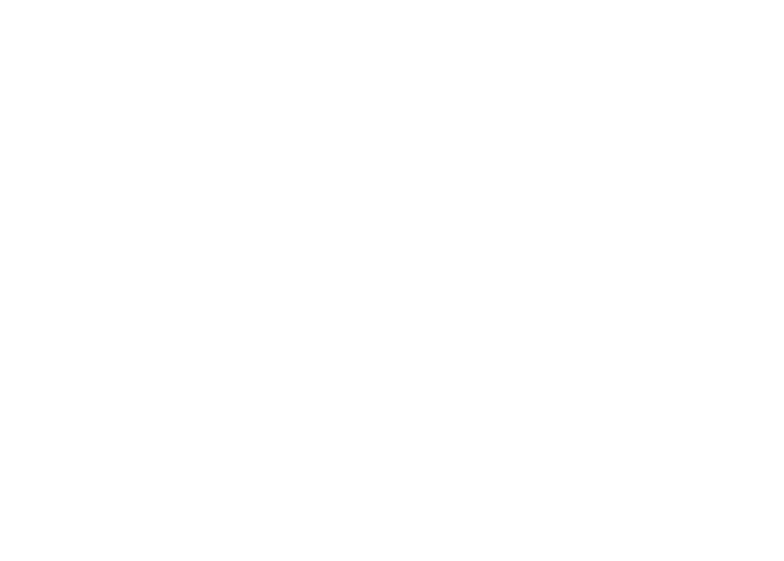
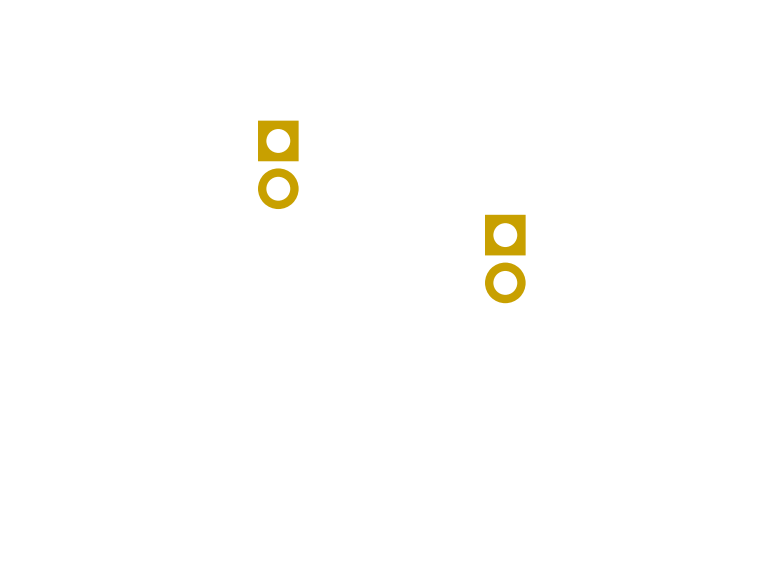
part: none -> (278, 164)
part: none -> (505, 259)

